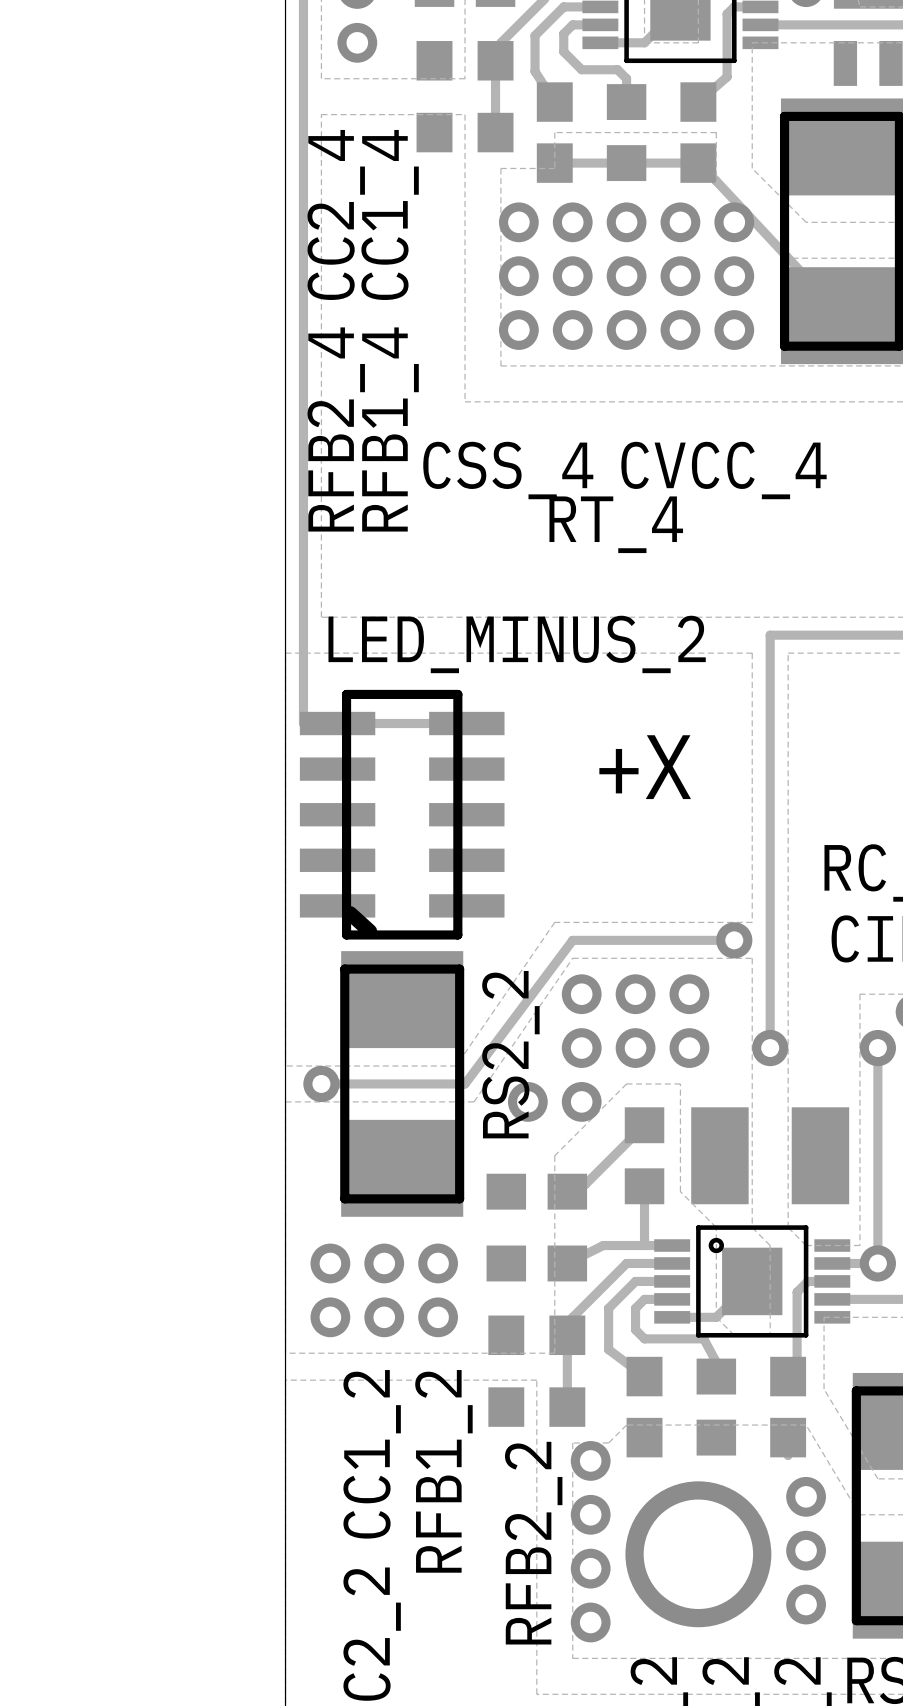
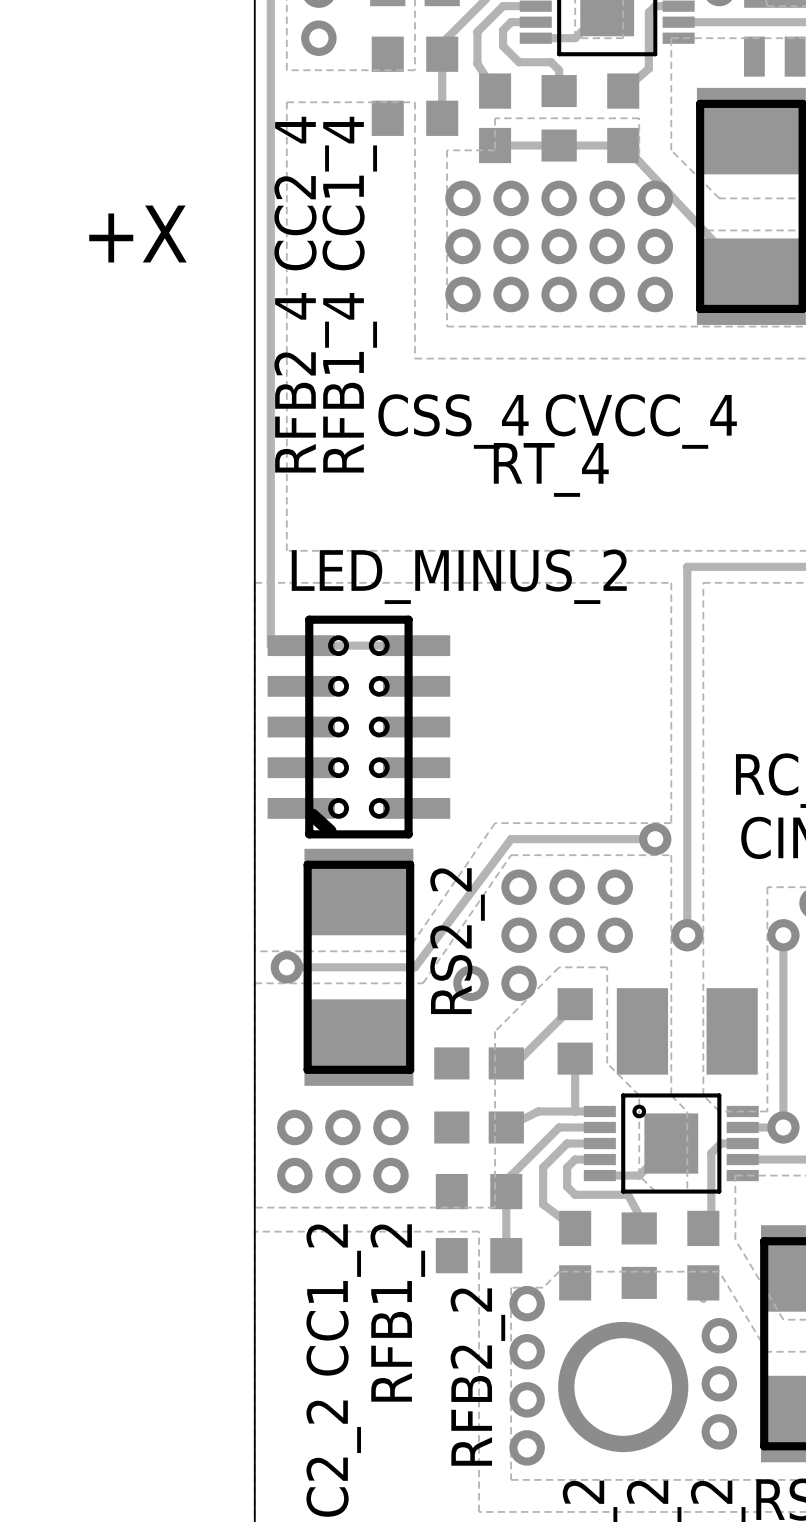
LED_MINUS_2 footprint: [299, 689, 505, 940] -> [267, 615, 451, 839]
text position: +X (645, 767) -> +X (137, 233)

